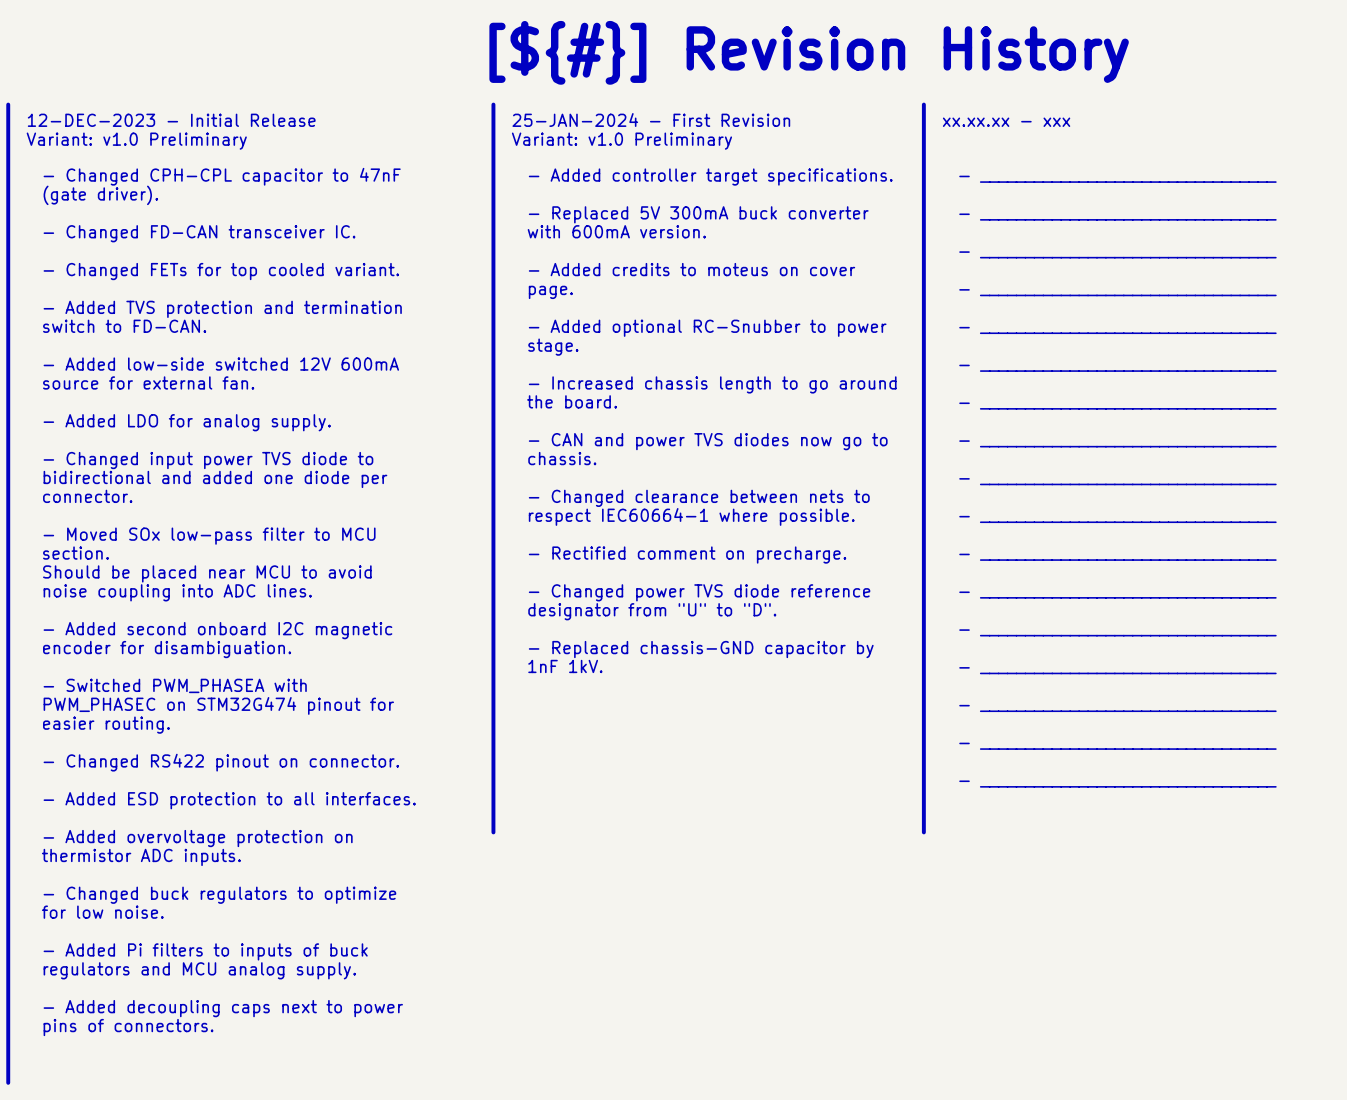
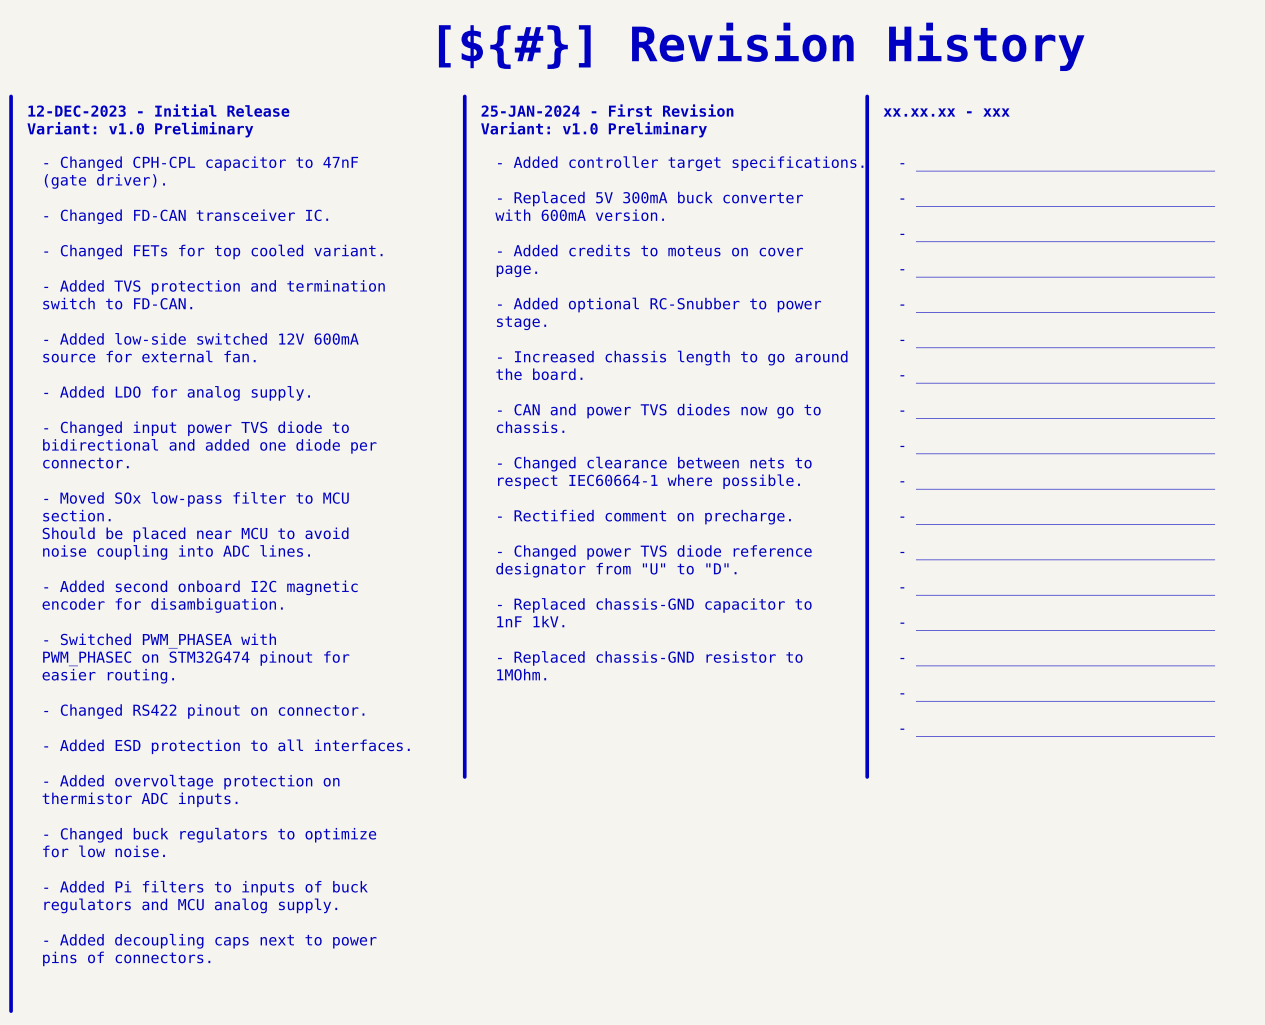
text: - Replaced chassis-GND capacitor by (701, 649) -> - Replaced chassis-GND capacitor to (654, 605)
text: none -> - Replaced chassis-GND resistor to (650, 658)
text: none -> 1MOhm. (521, 674)

